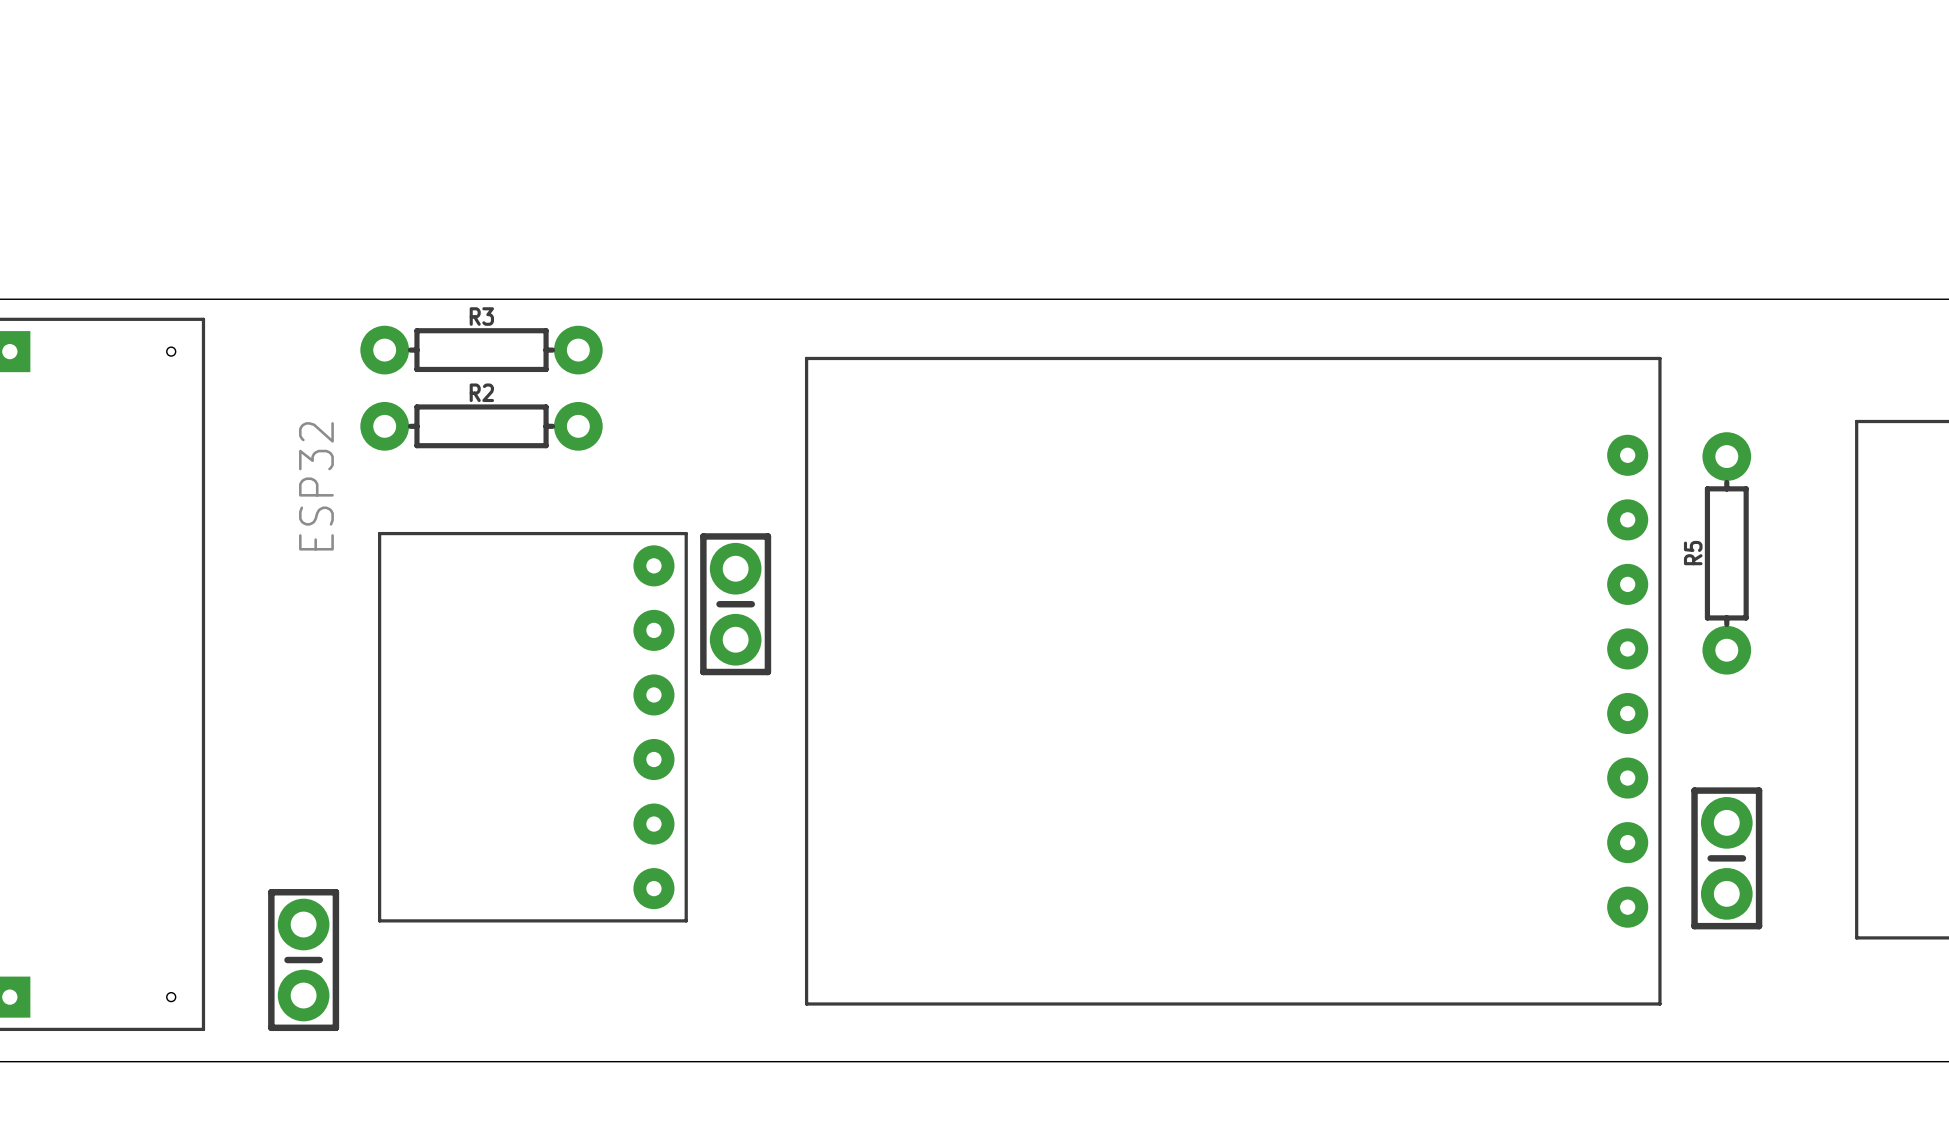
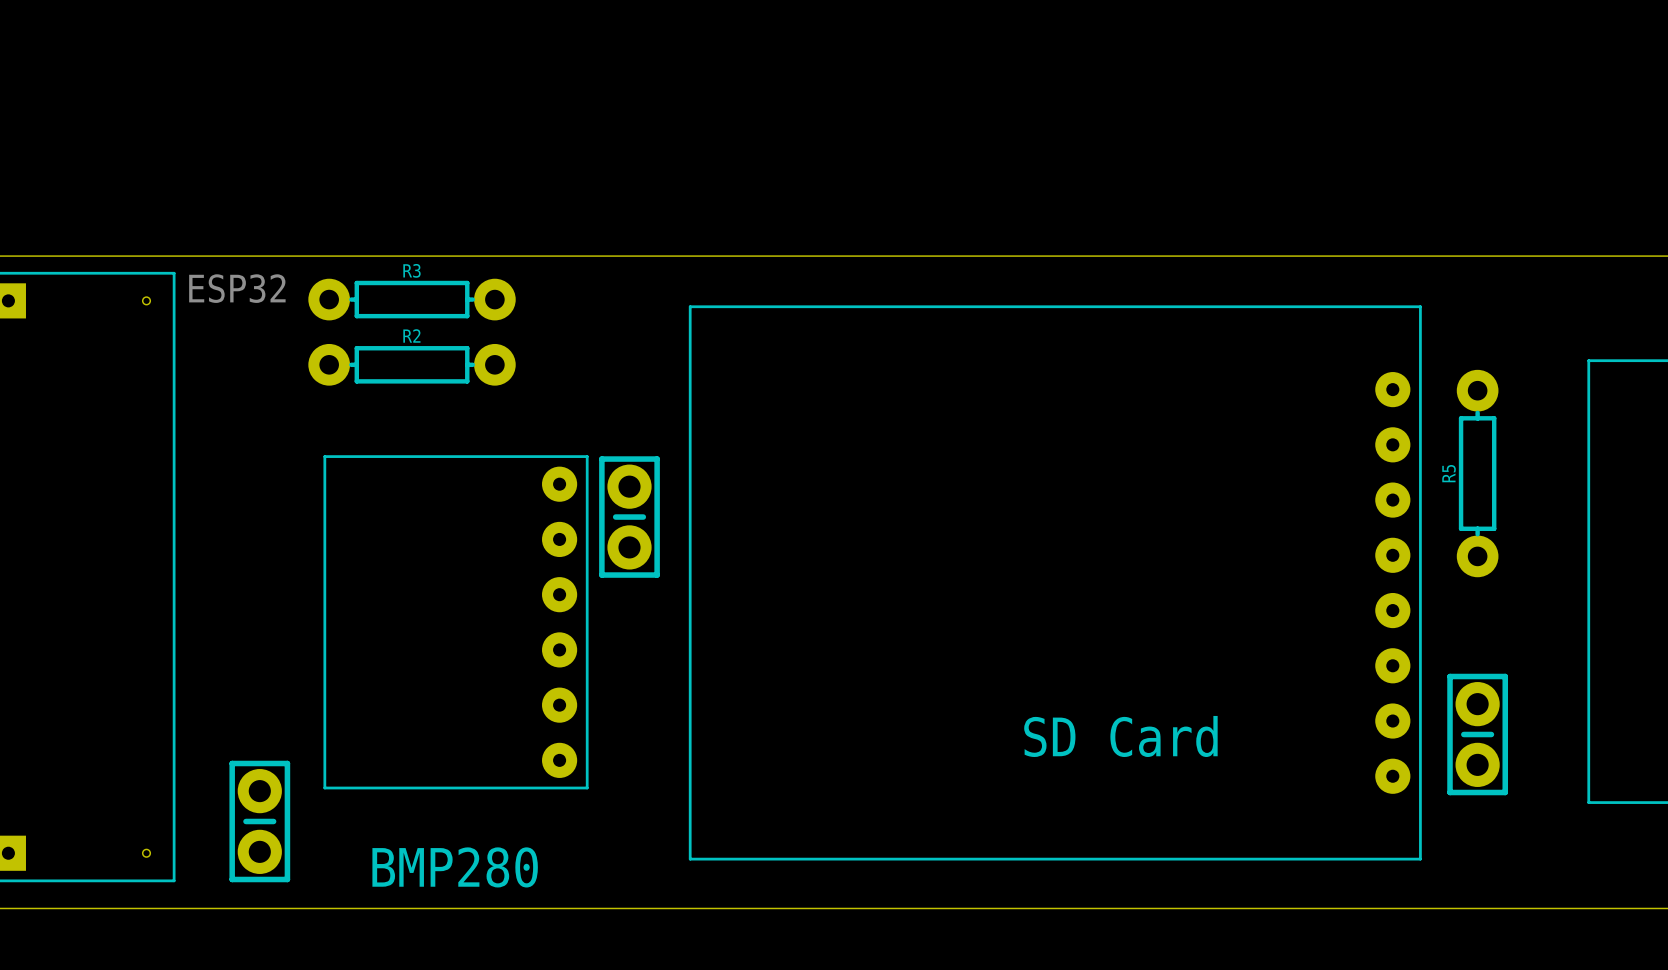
part value rotation: 0° (316, 486) -> 90° clockwise (237, 288)
part value position: ESP32 (316, 486) -> ESP32 (237, 288)
text: none -> SD Card (1120, 736)
text: none -> BMP280 (455, 867)

